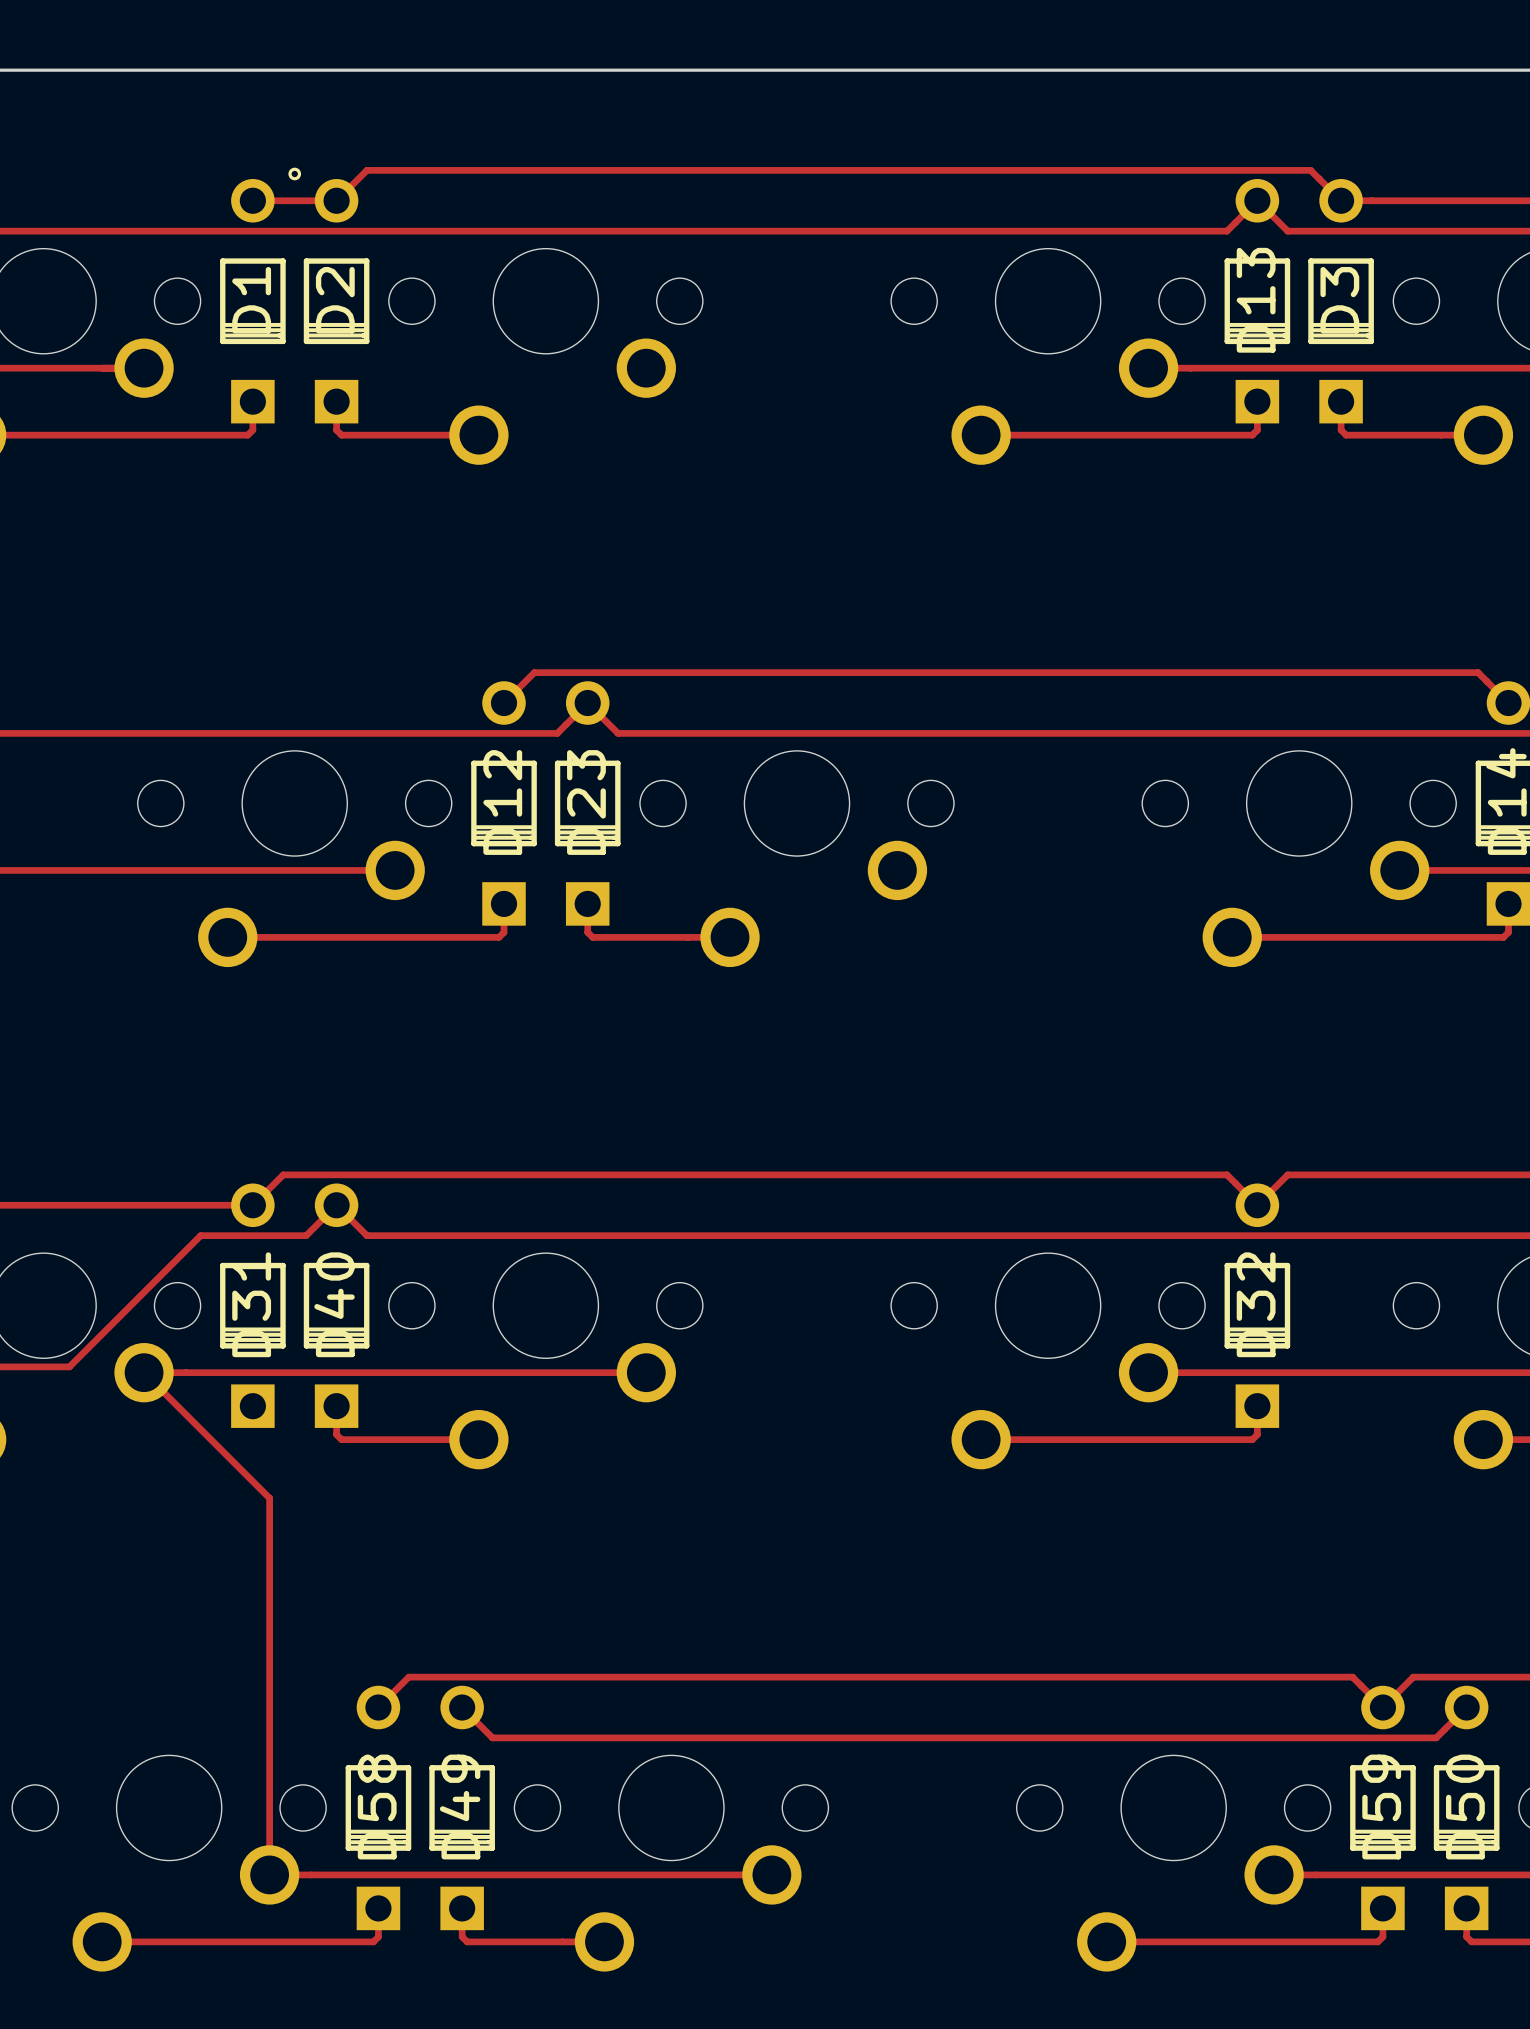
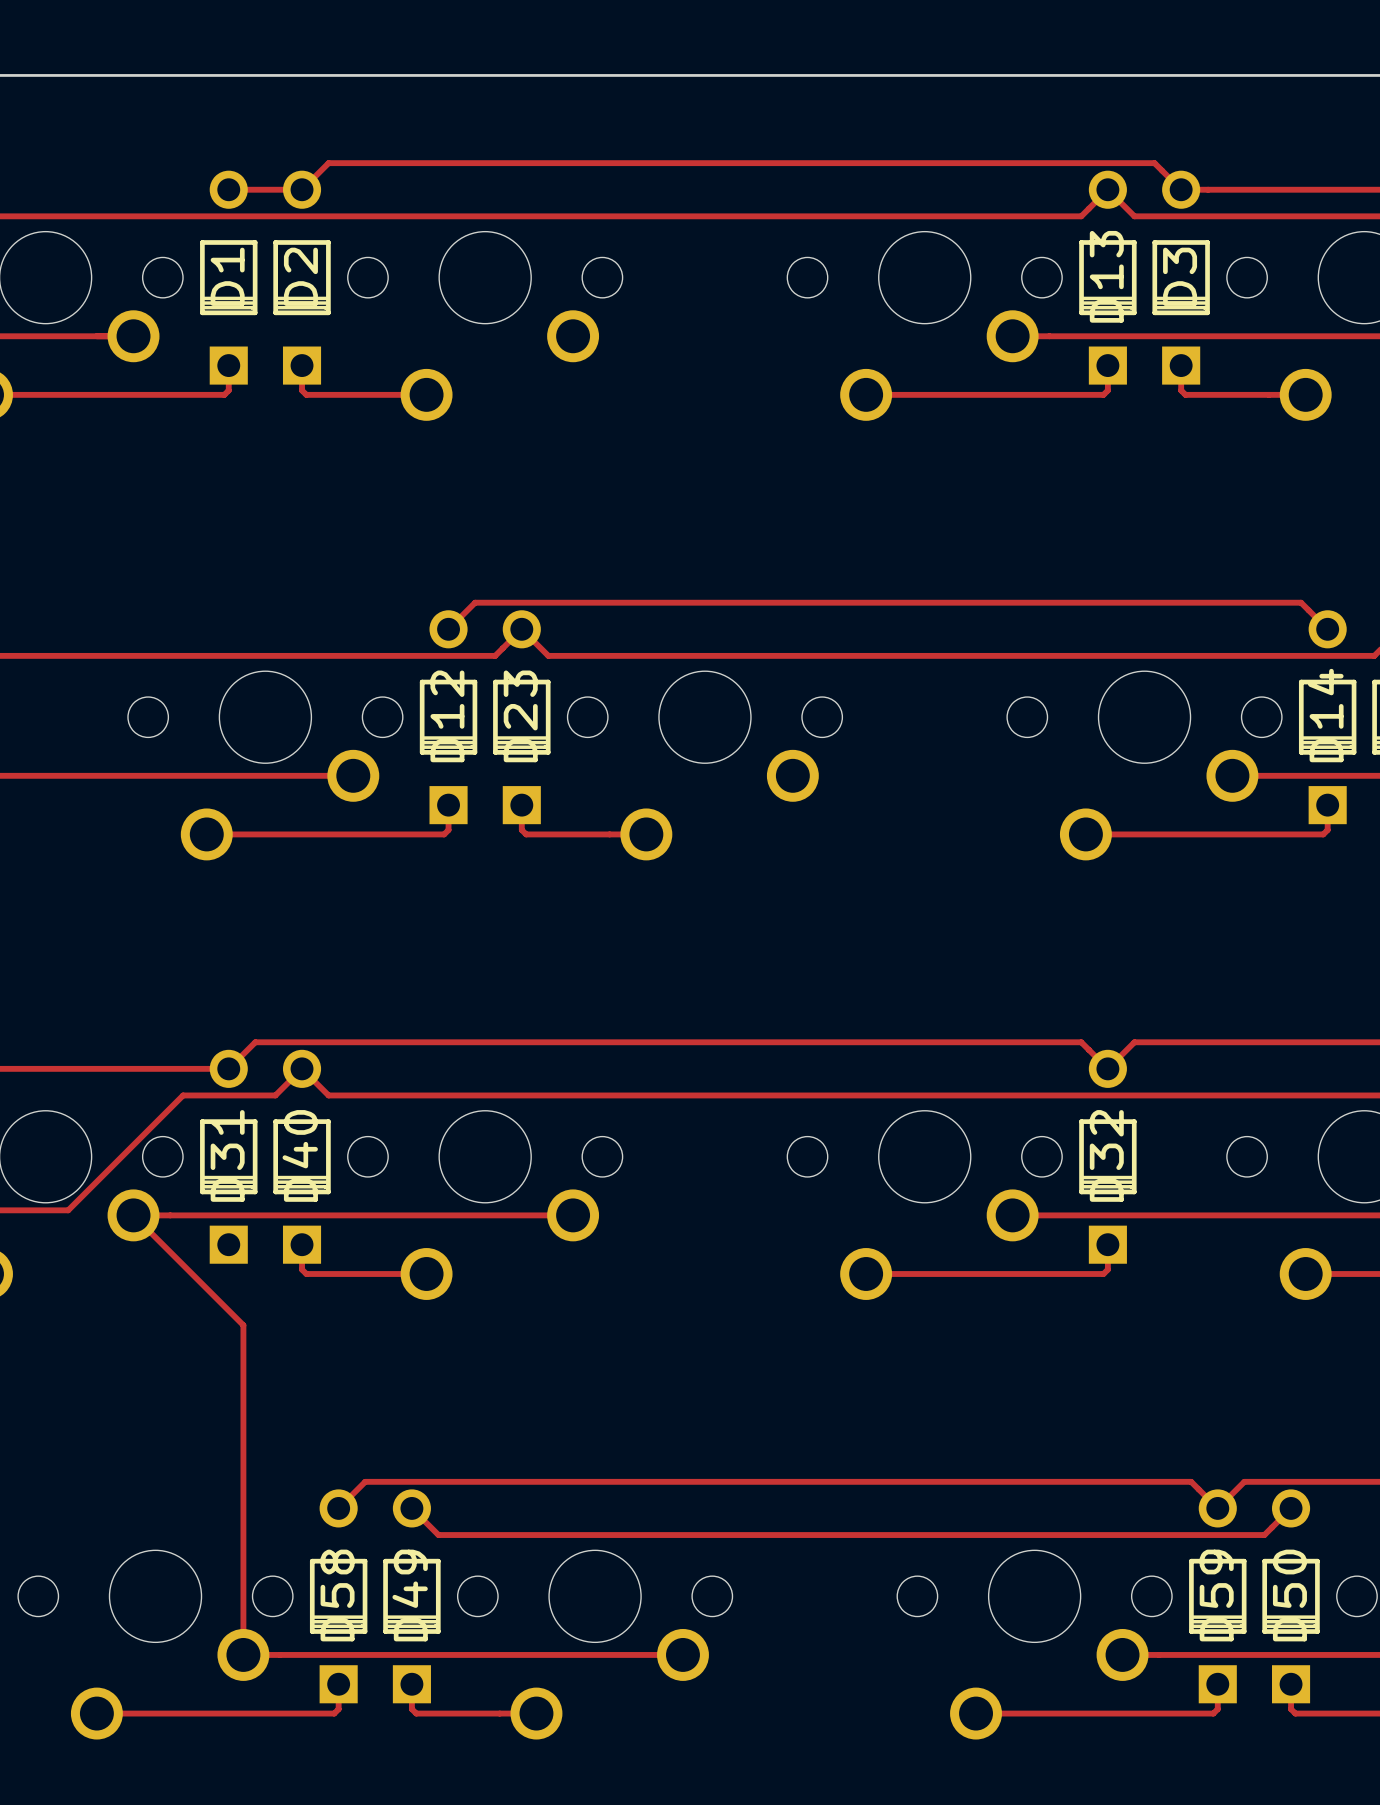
drawing: [288, 167, 302, 181] -> none

